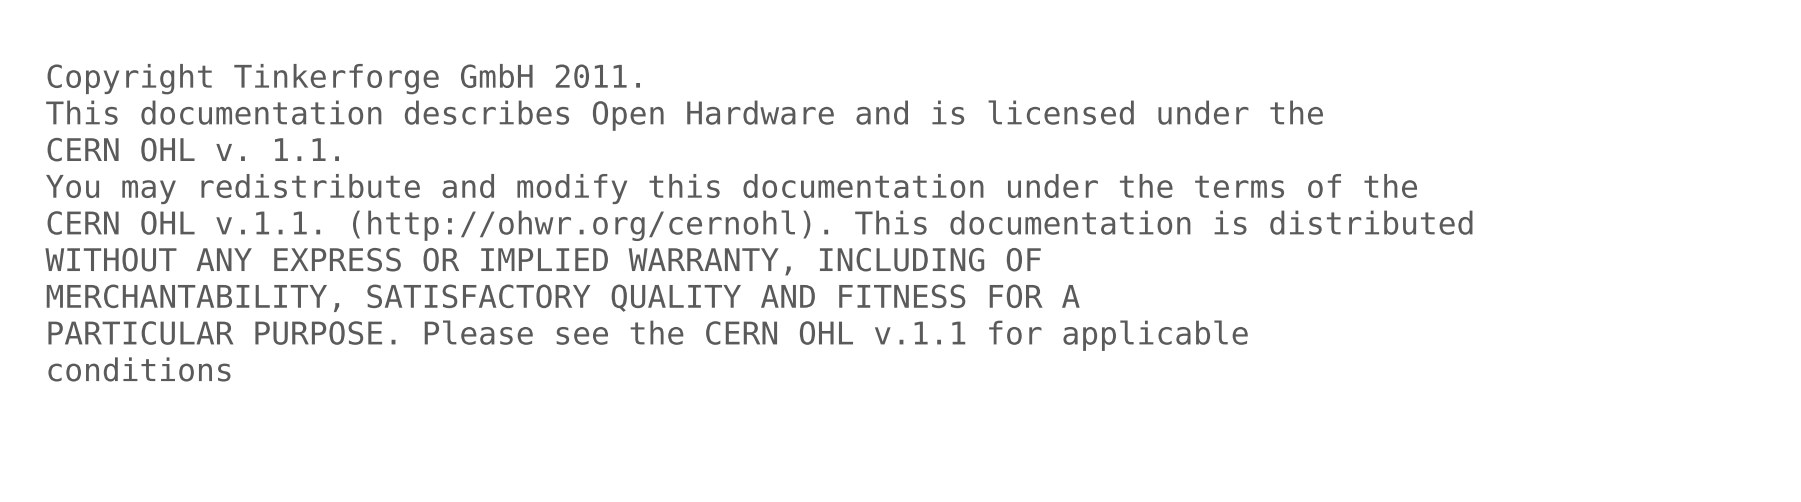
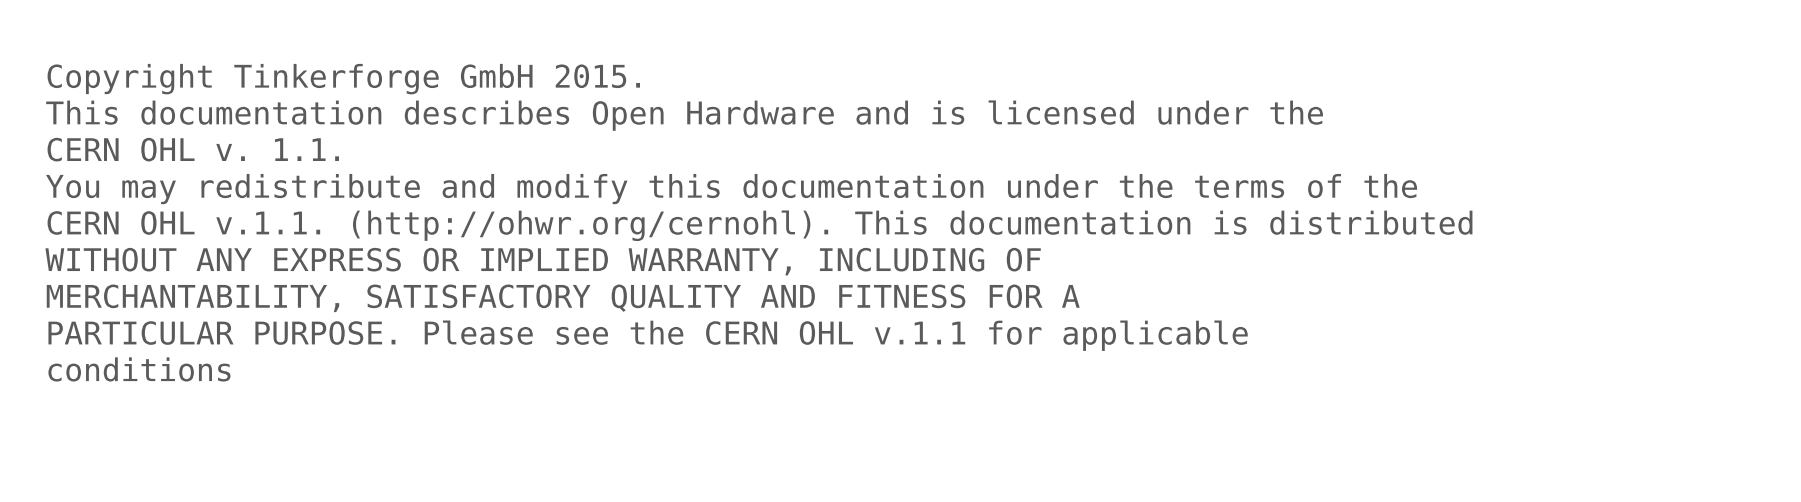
text: Copyright Tinkerforge GmbH 2011. (343, 79) -> Copyright Tinkerforge GmbH 2015. (343, 79)

